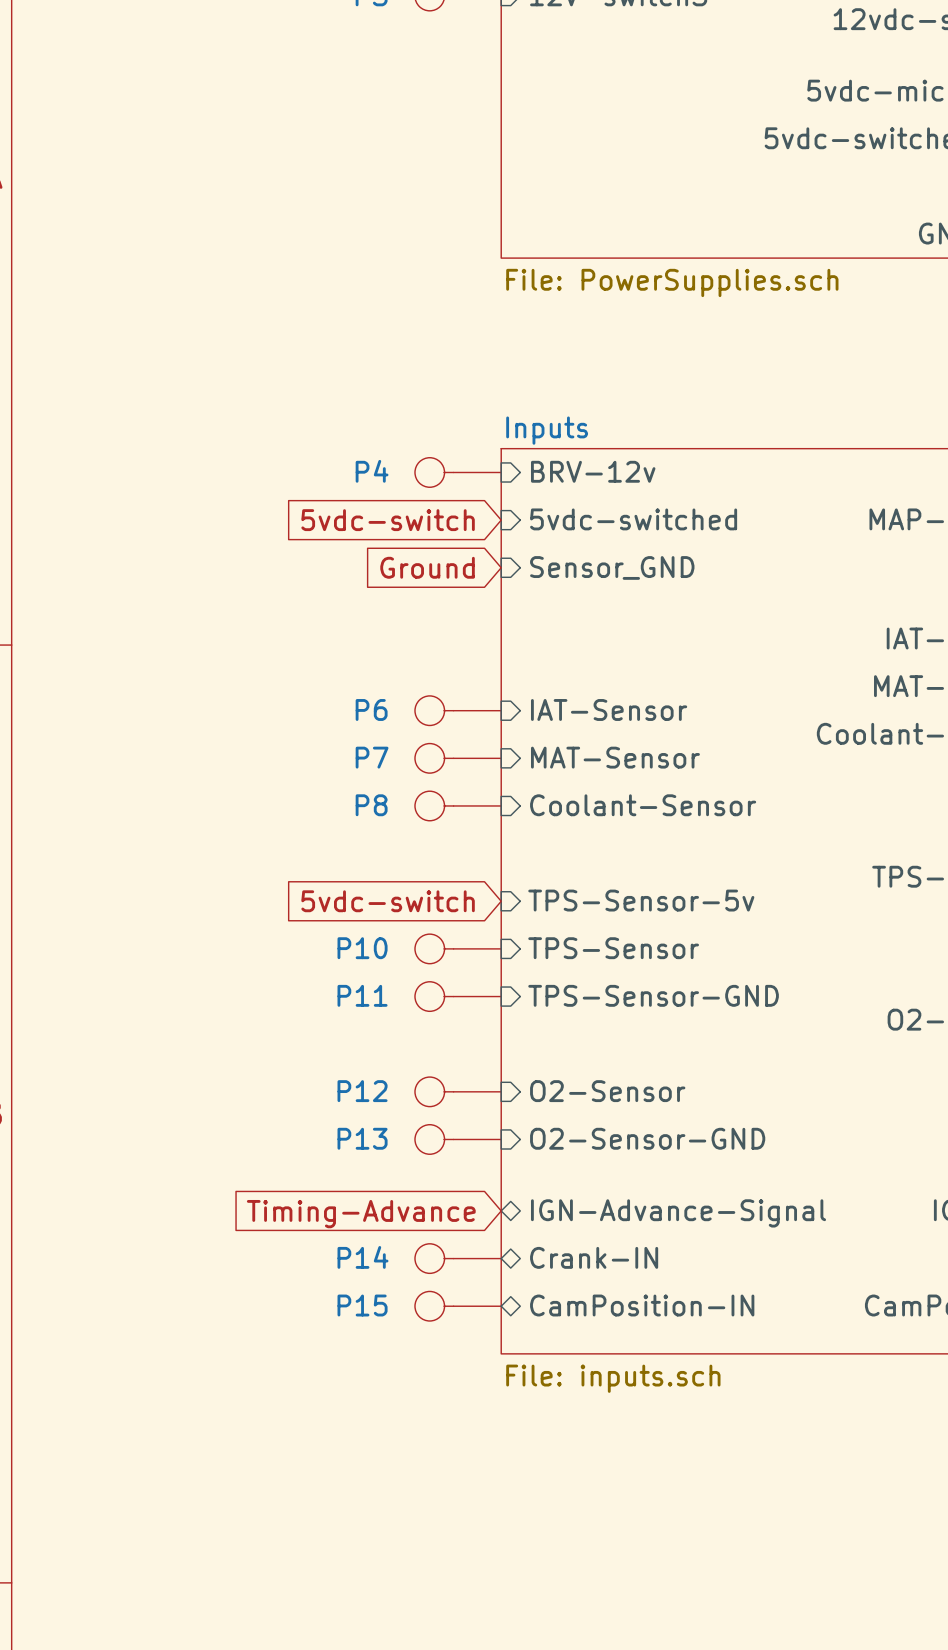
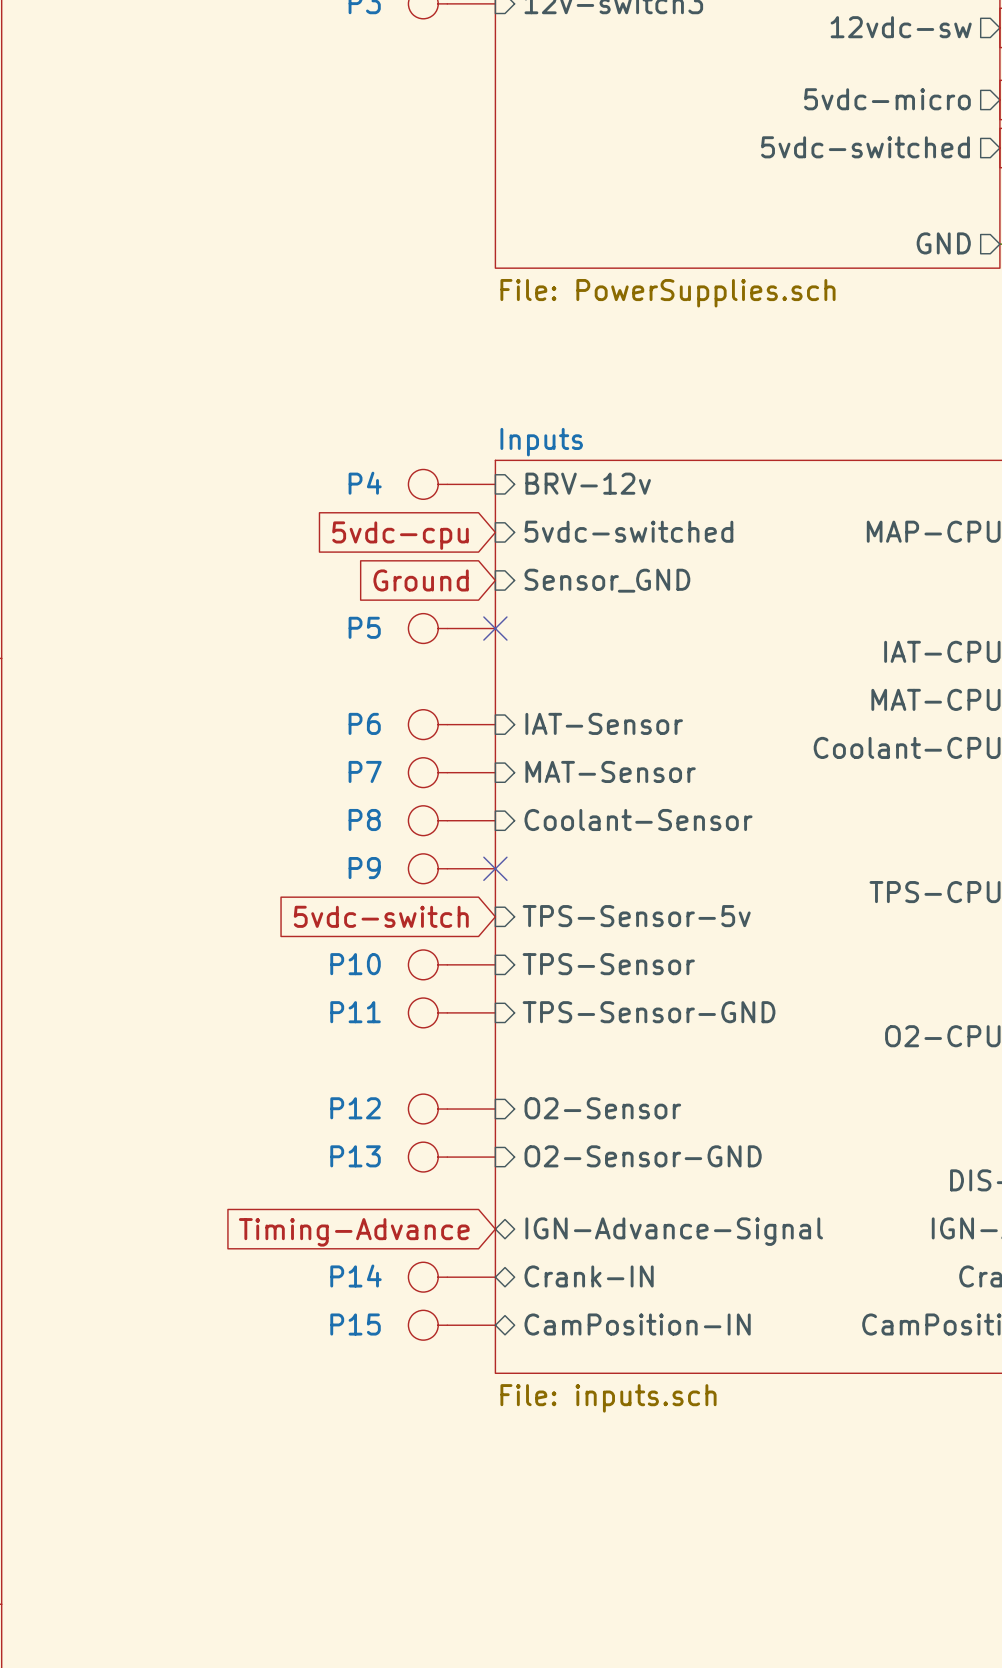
global label: 5vdc-switch (388, 520) -> 5vdc-cpu (400, 535)
P5: none -> (451, 628)
no-connect mark: none -> (495, 628)
P9: none -> (451, 868)
no-connect mark: none -> (495, 868)

